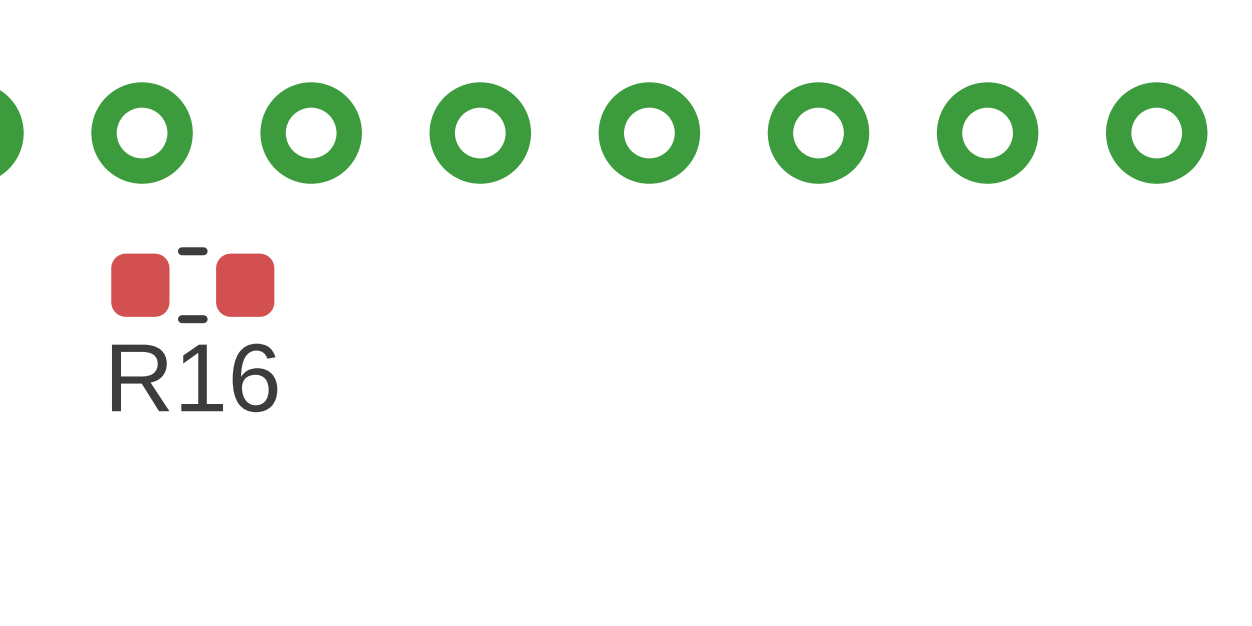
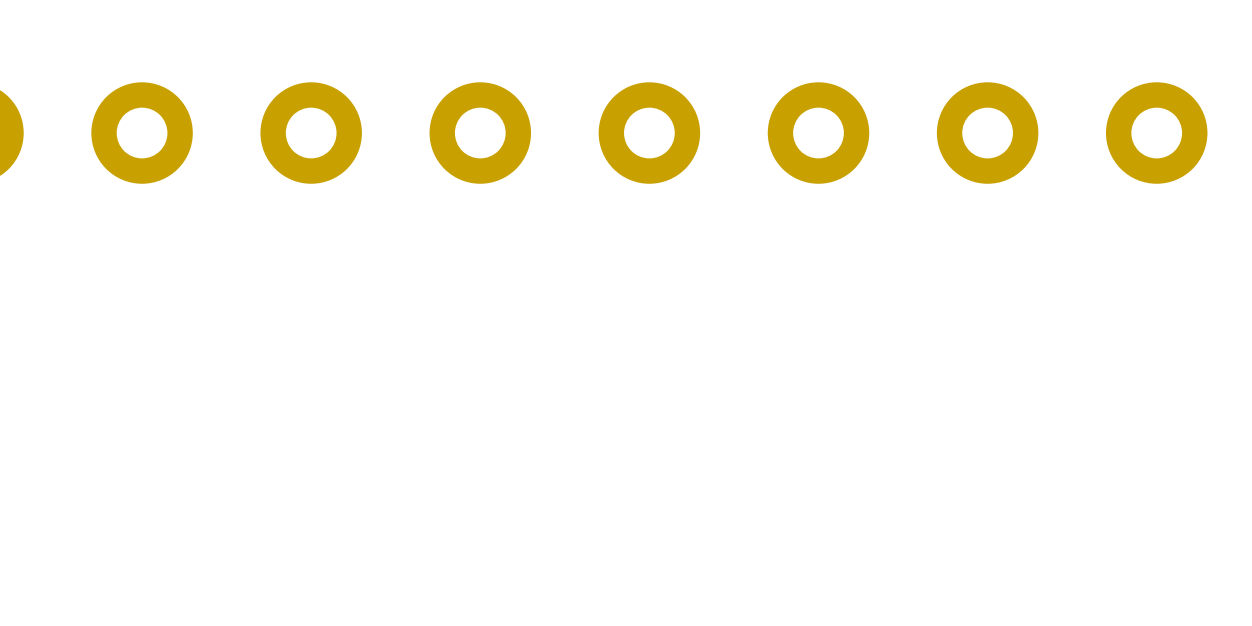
R16: (192, 285) -> none

